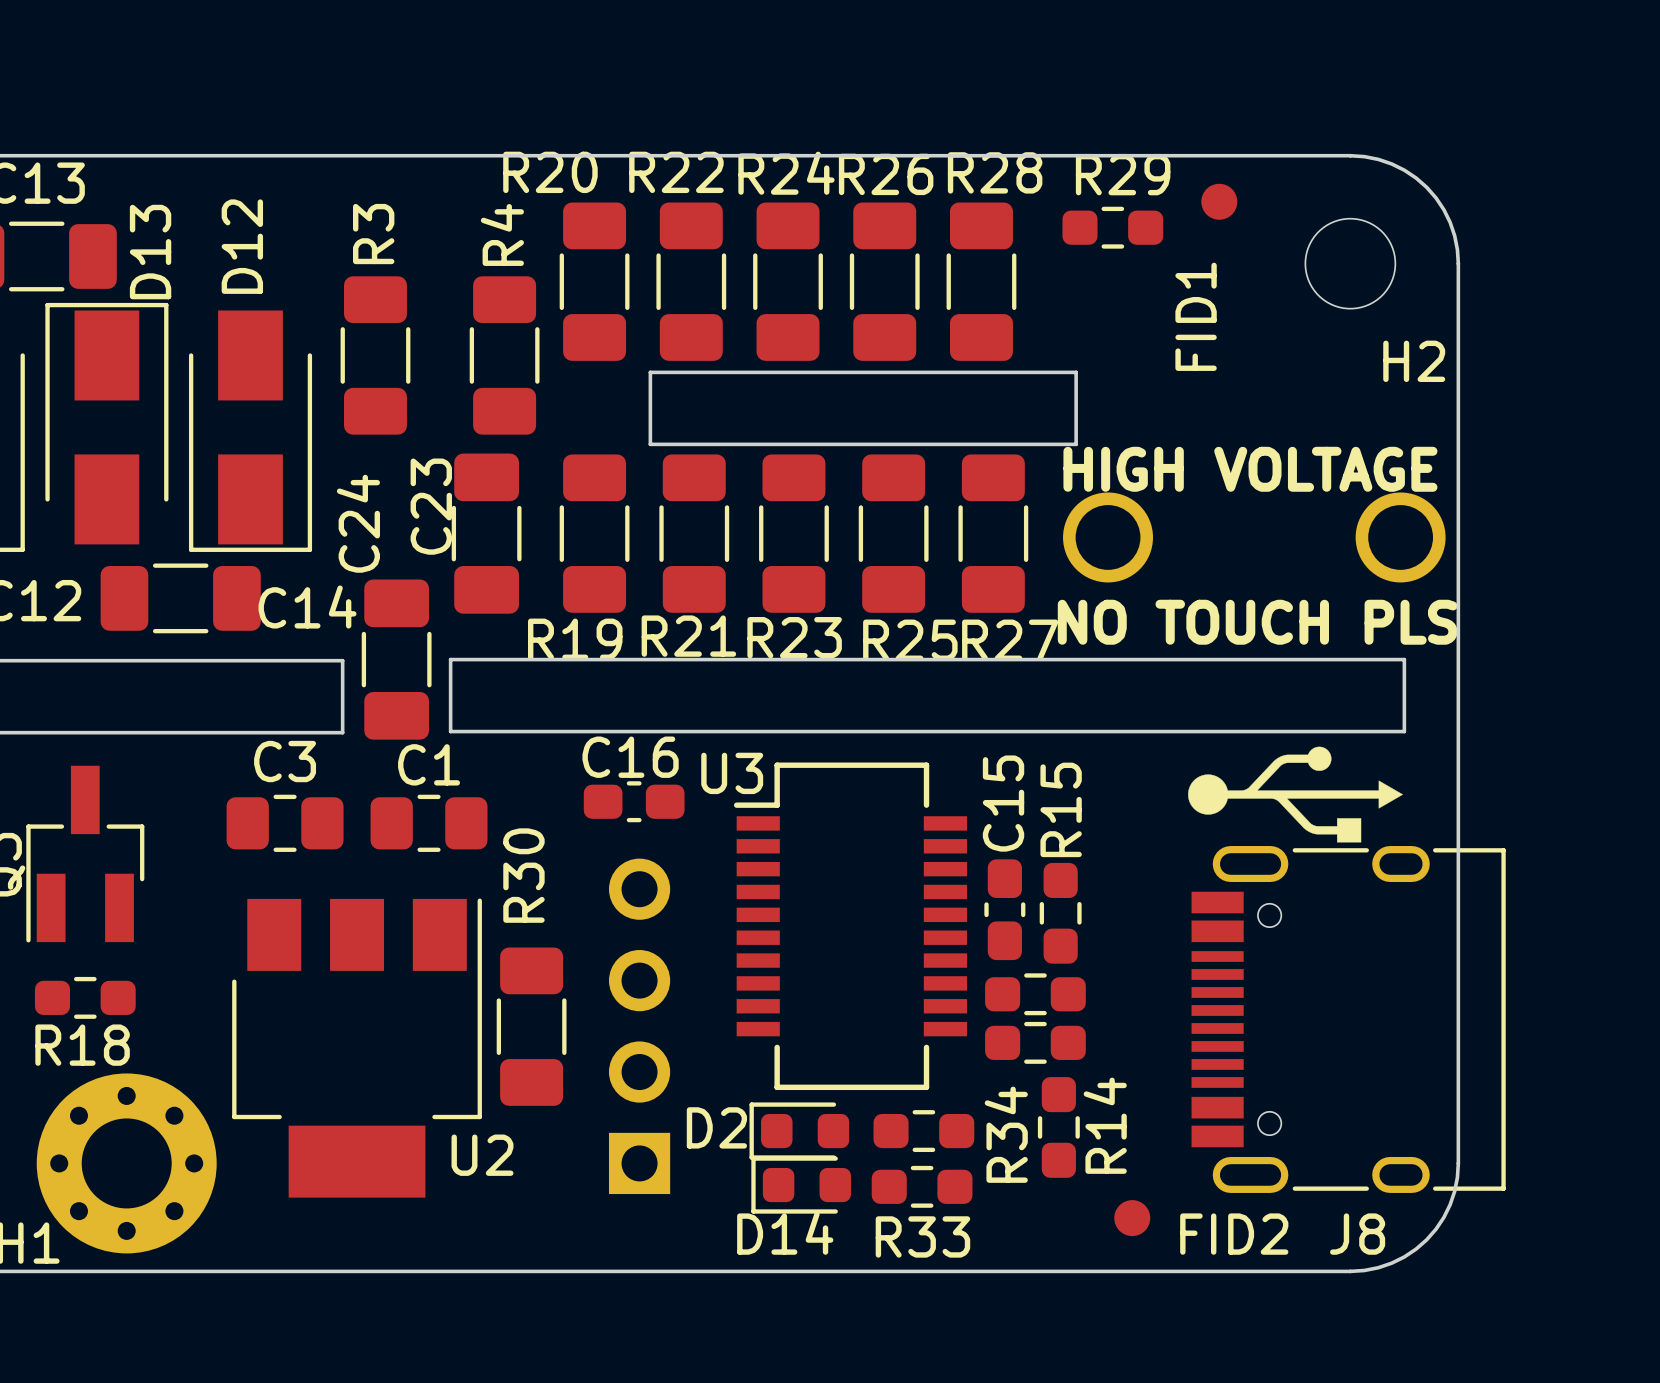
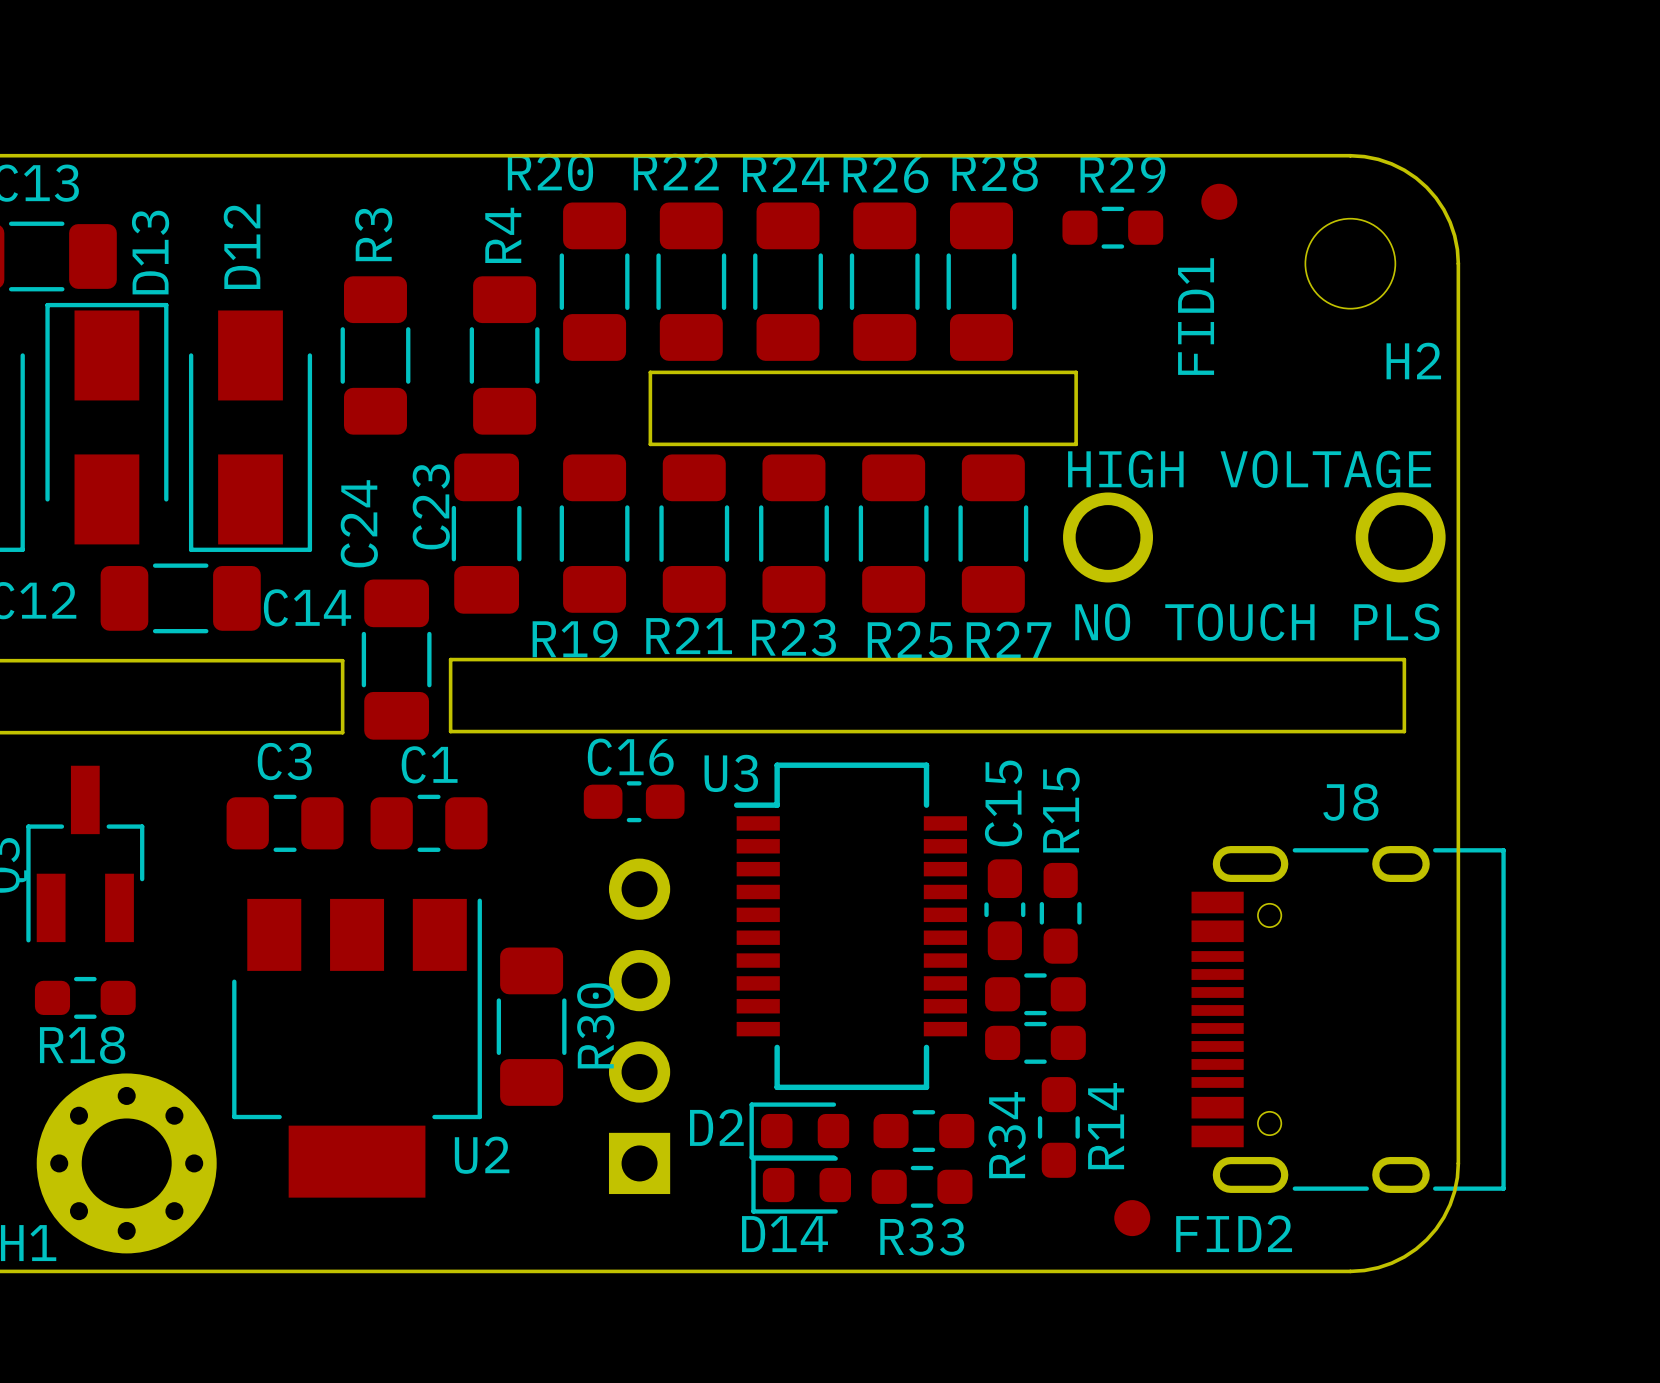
drawing: [1188, 746, 1403, 843] -> none
R30 name position: R30 (523, 875) -> R30 (595, 1025)
J8 name position: J8 (1357, 1234) -> J8 (1350, 802)

